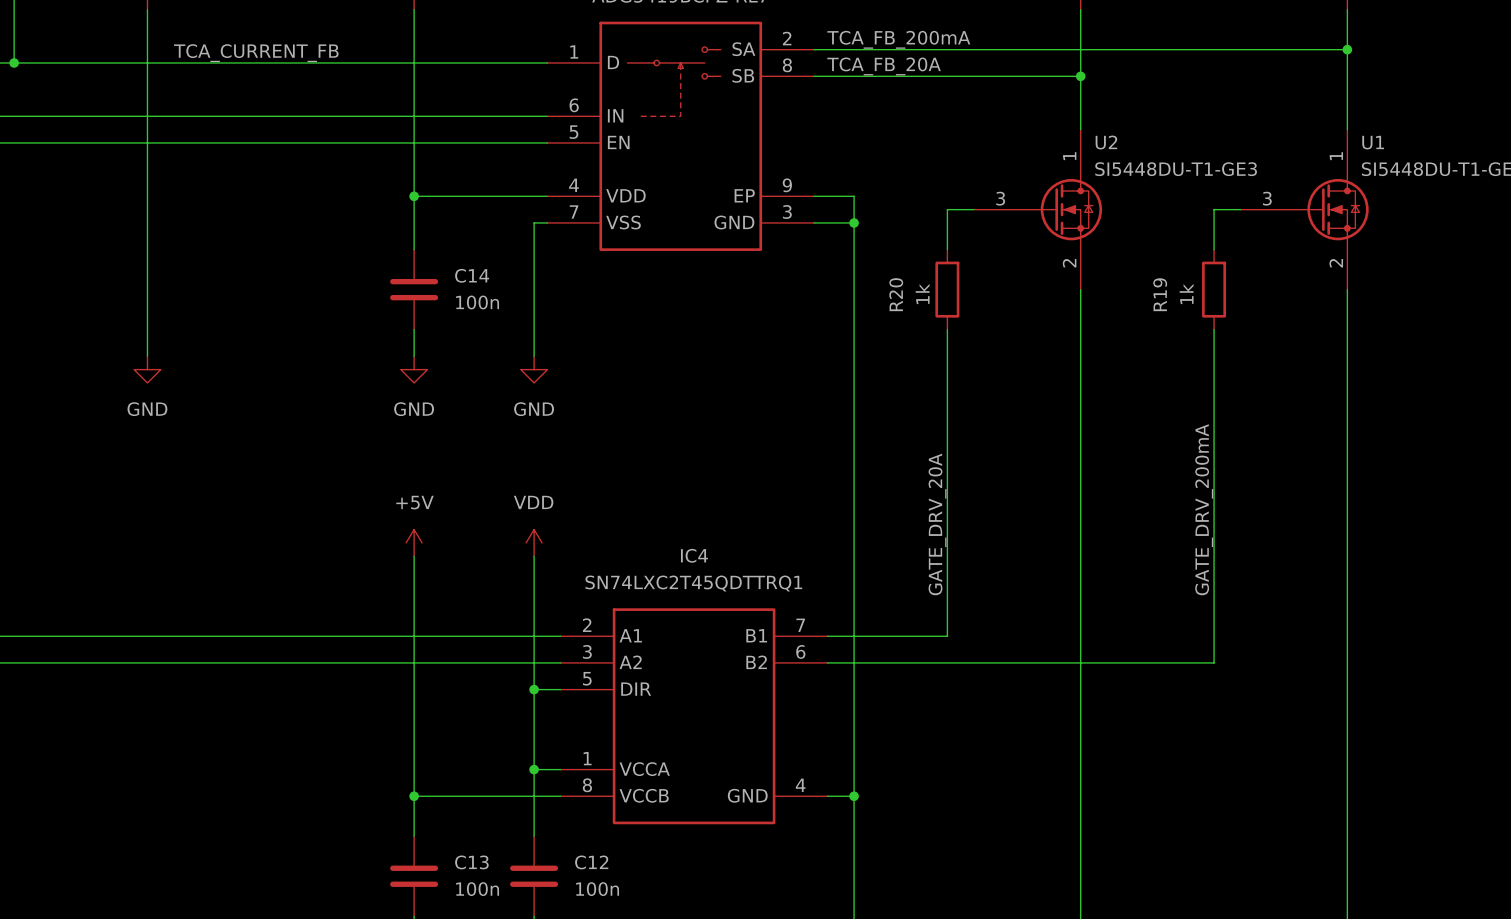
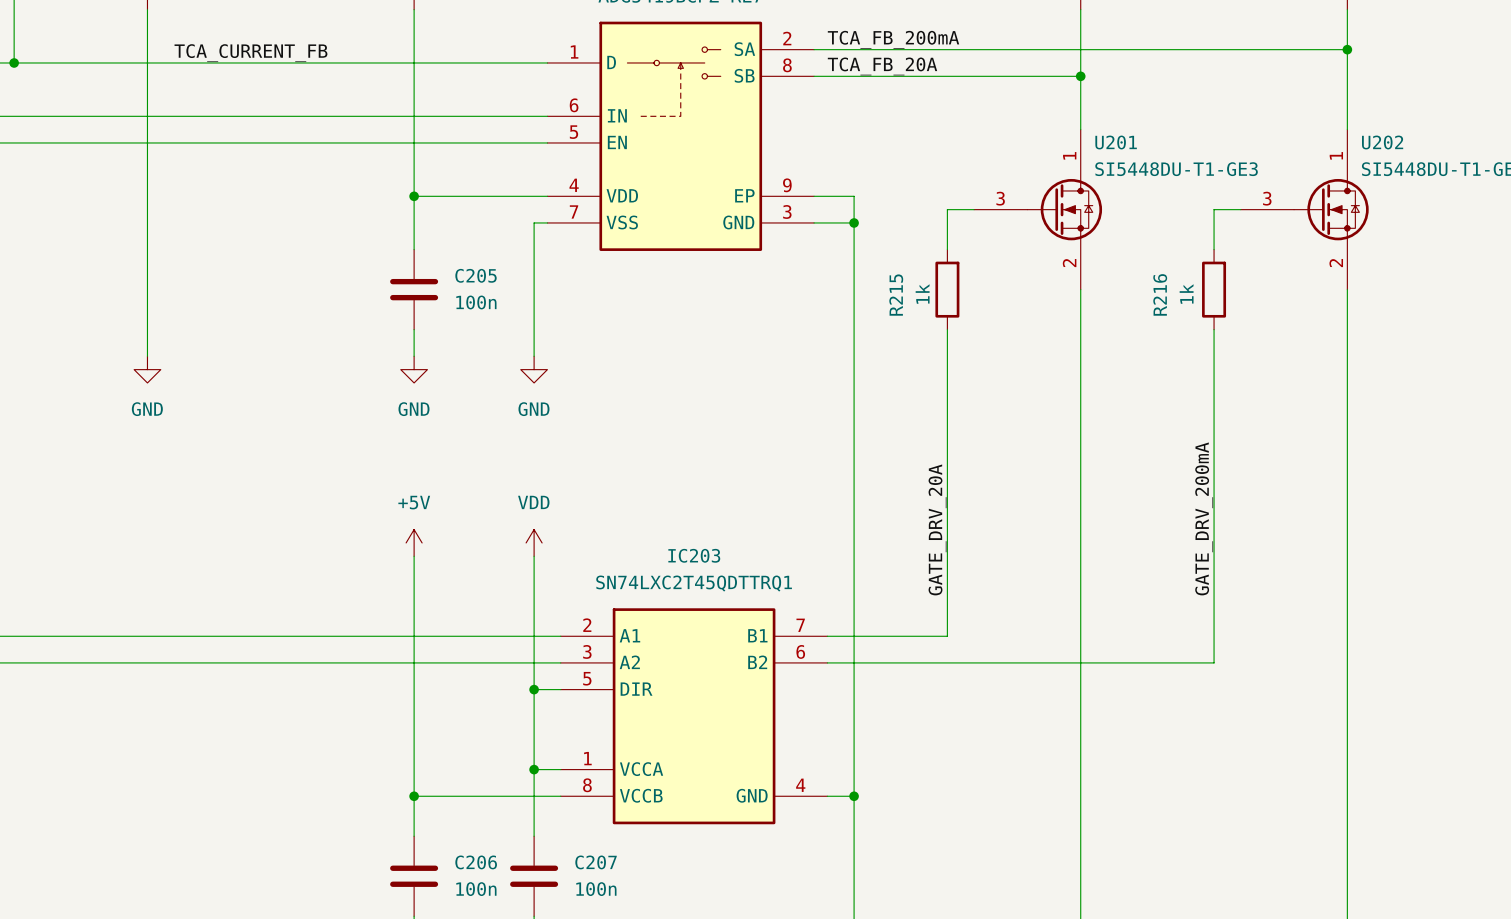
U2 name: U2 (1106, 142) -> U201 (1116, 142)
U1 name: U1 (1373, 142) -> U202 (1382, 142)
C14 name: C14 (472, 275) -> C205 (476, 275)
R20 name: R20 (896, 294) -> R215 (896, 295)
R19 name: R19 (1160, 294) -> R216 (1160, 294)
IC4 name: IC4 (694, 555) -> IC203 (694, 555)
C13 name: C13 (471, 862) -> C206 (476, 862)
C12 name: C12 (591, 862) -> C207 (596, 862)

